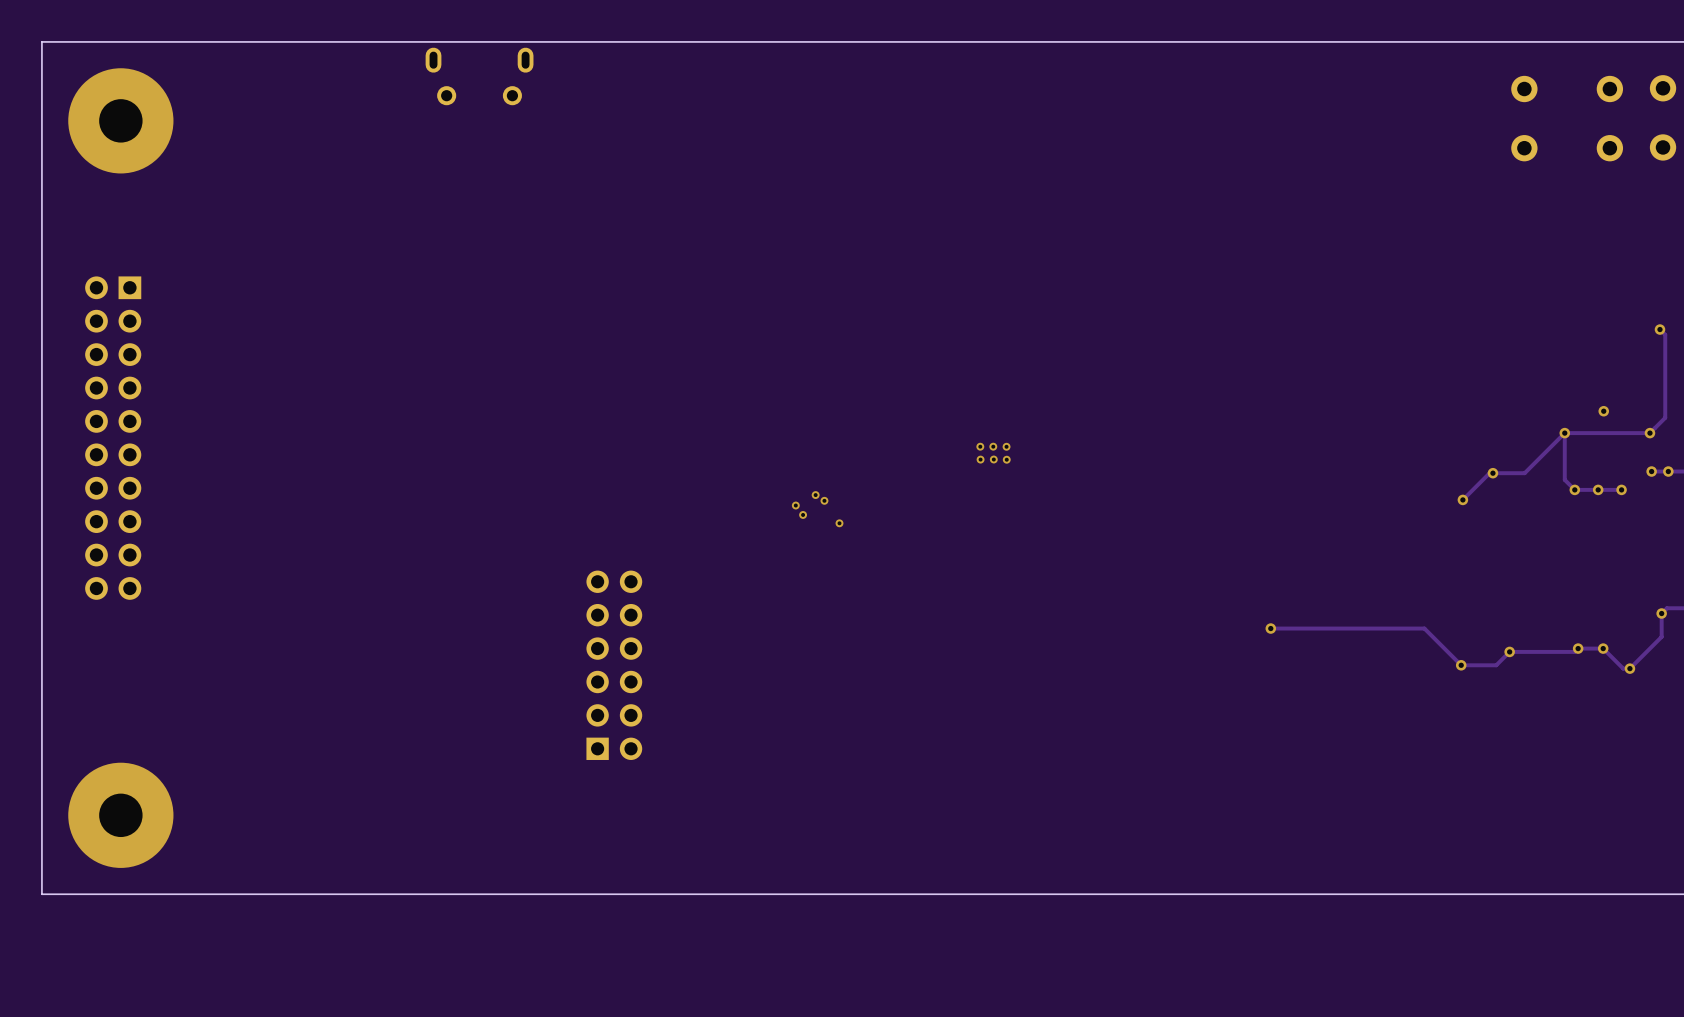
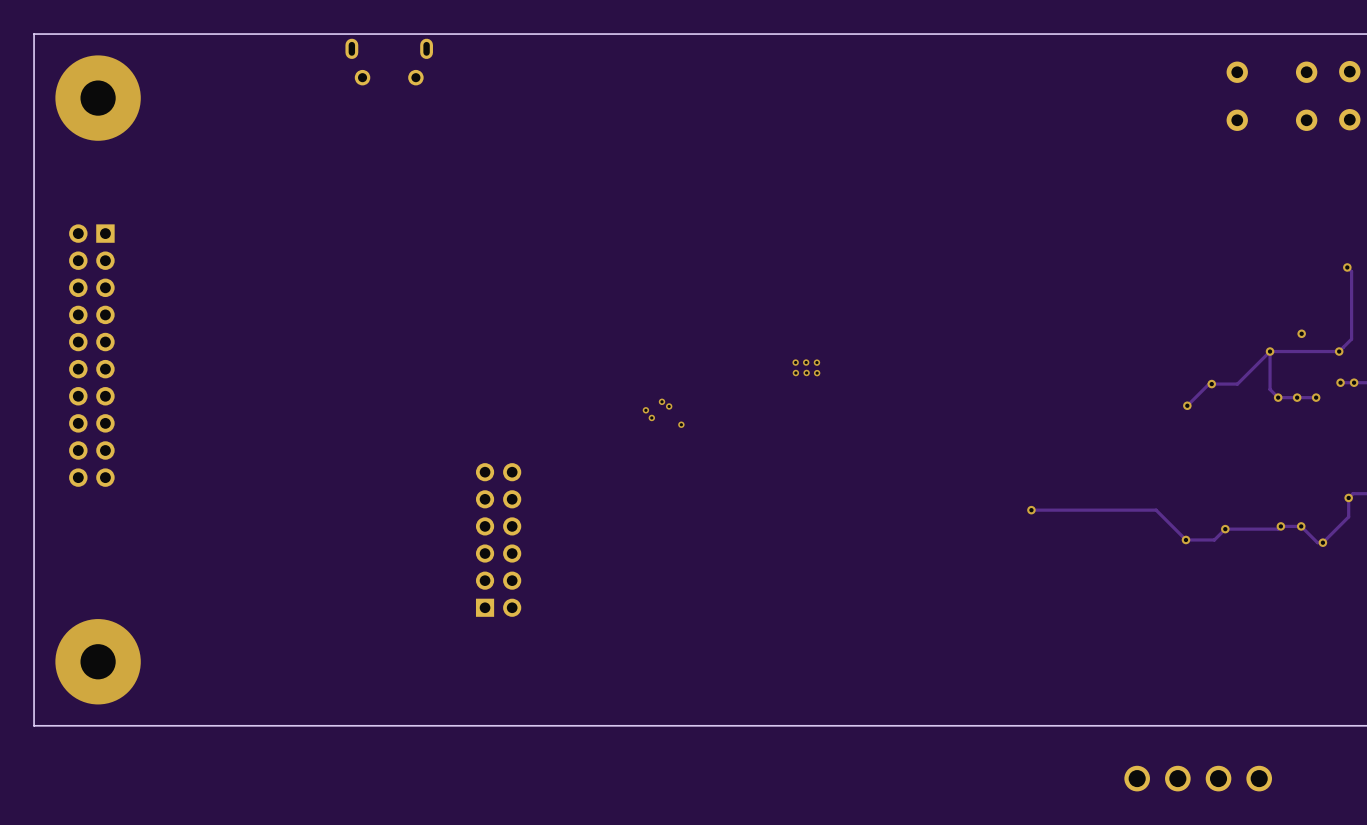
part: none -> (1198, 778)

